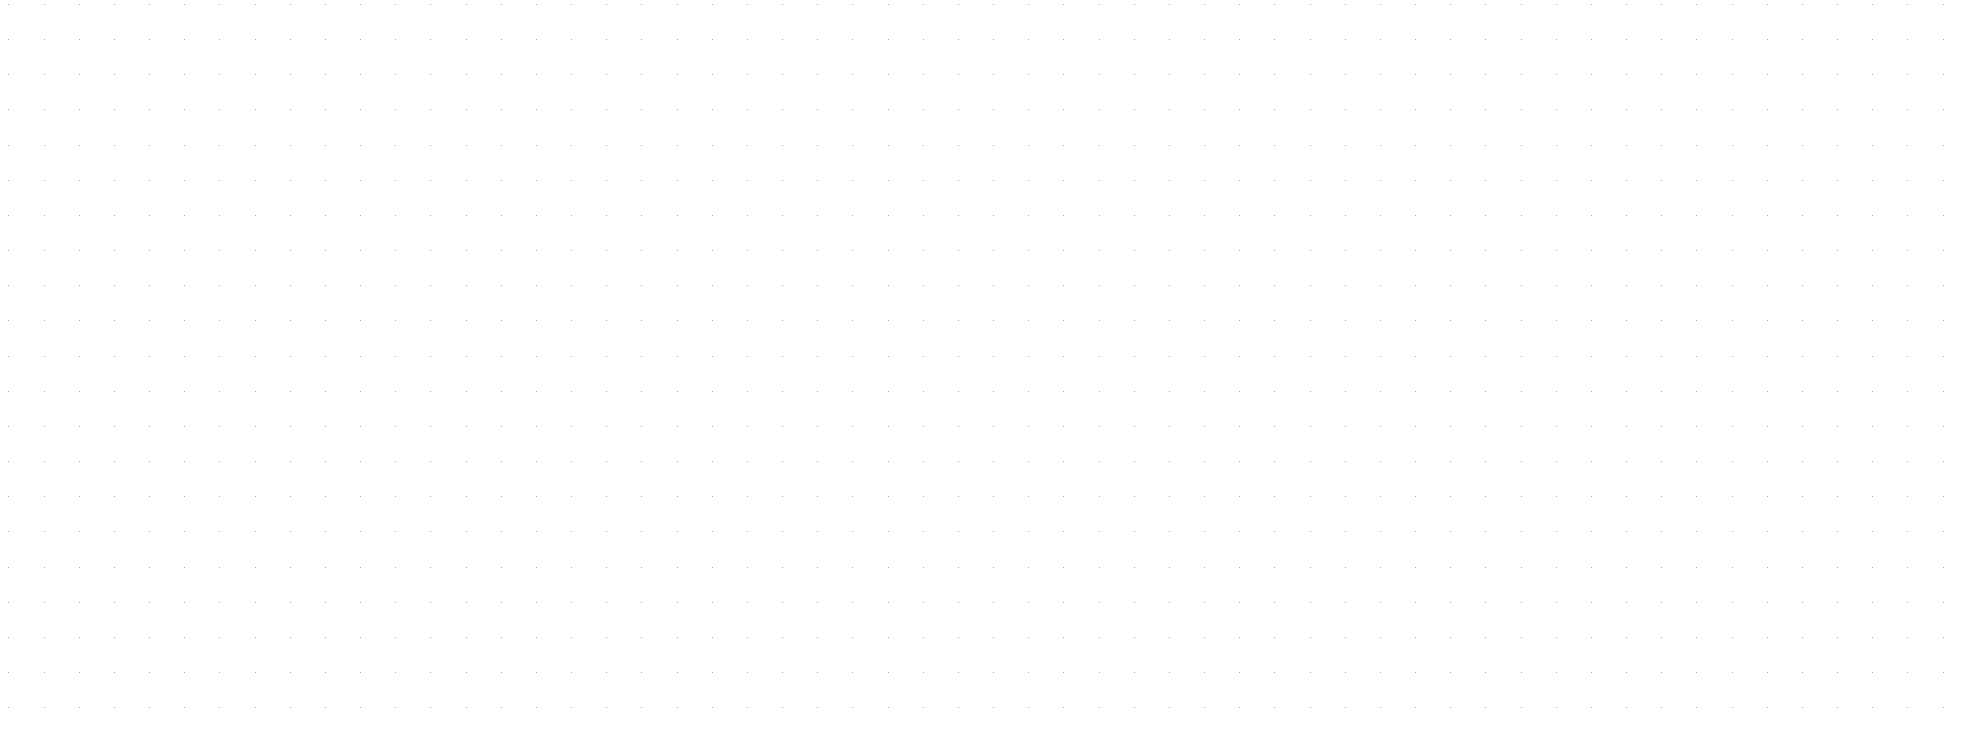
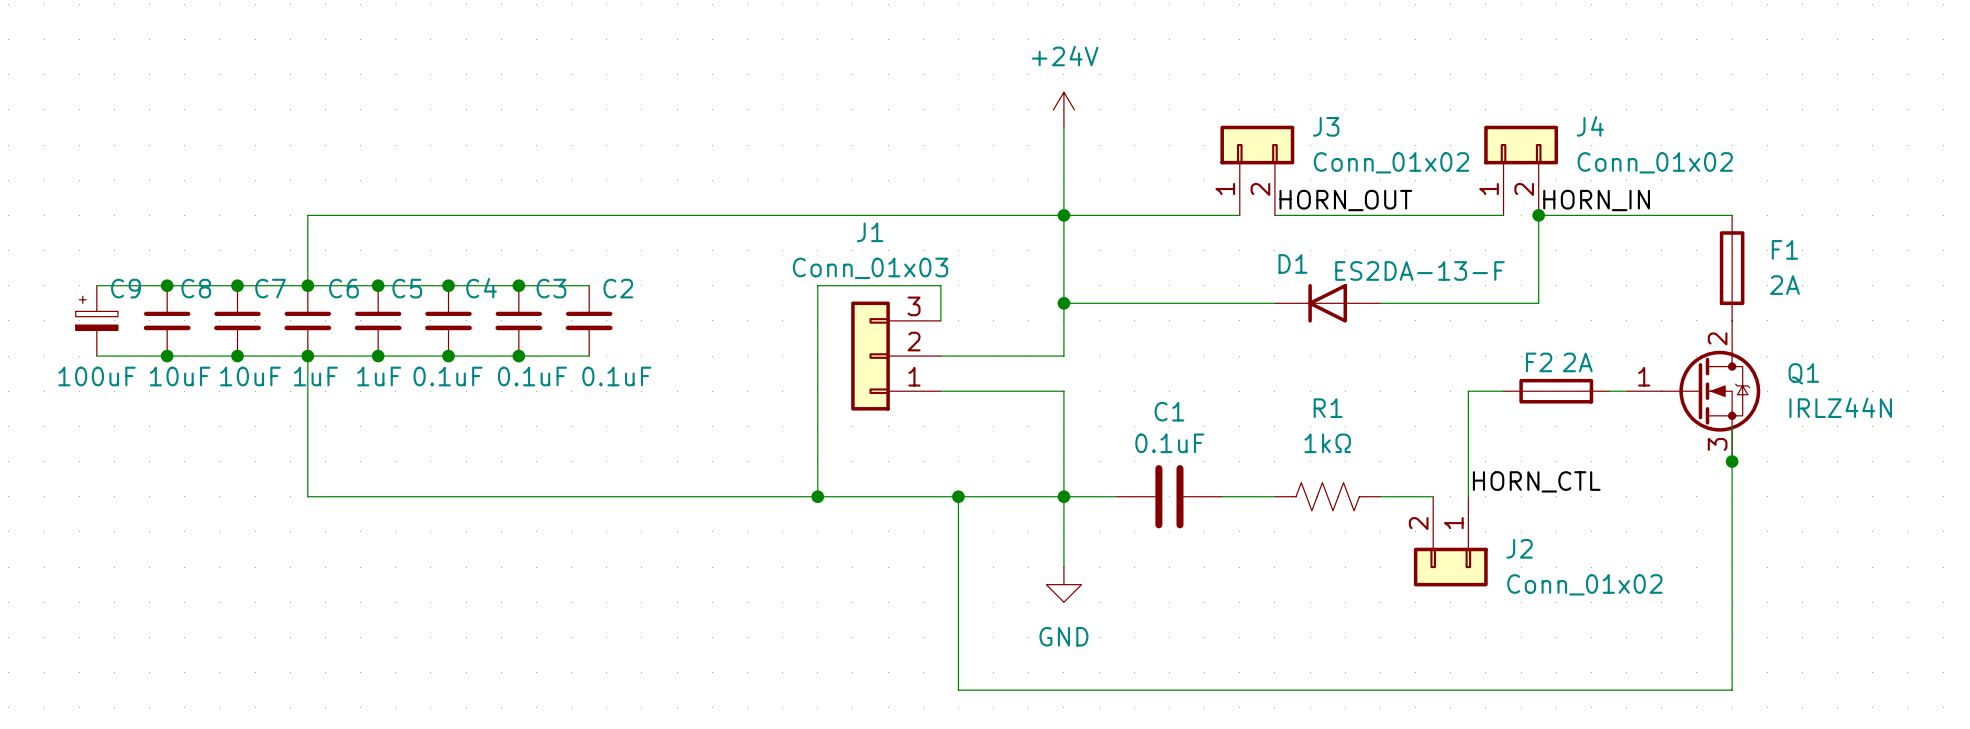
power symbol: none -> +24V (1063, 109)
wire: none -> (1063, 127) (1063, 356) (940, 356)
J3: none -> Conn_01x02 (1257, 170)
J4: none -> Conn_01x02 (1521, 170)
label: none -> HORN_OUT (1345, 200)
label: none -> HORN_IN (1596, 200)
junction: none -> (1063, 215)
wire: none -> (1239, 215) (307, 215) (307, 285)
wire: none -> (1274, 215) (1503, 215)
junction: none -> (1538, 215)
wire: none -> (1732, 215) (1538, 215) (1538, 303) (1380, 303)
F1: none -> 2A (1732, 268)
wire: none -> (96, 285) (589, 285)
junction: none -> (167, 285)
junction: none -> (237, 285)
junction: none -> (307, 285)
junction: none -> (378, 285)
junction: none -> (448, 285)
junction: none -> (518, 285)
wire: none -> (1063, 303) (1274, 303)
junction: none -> (1063, 303)
D1: none -> ES2DA-13-F (1327, 303)
C9: none -> 100uF (96, 320)
C8: none -> 10uF (167, 320)
C7: none -> 10uF (237, 320)
C6: none -> 1uF (307, 320)
C5: none -> 1uF (378, 320)
C4: none -> 0.1uF (448, 320)
C3: none -> 0.1uF (518, 320)
C2: none -> 0.1uF (589, 320)
wire: none -> (940, 320) (940, 285) (817, 285) (817, 496)
wire: none -> (96, 356) (589, 356)
junction: none -> (167, 356)
junction: none -> (237, 356)
wire: none -> (307, 356) (307, 496) (1116, 496)
junction: none -> (307, 356)
junction: none -> (378, 356)
junction: none -> (448, 356)
junction: none -> (518, 356)
J1: none -> Conn_01x03 (896, 356)
wire: none -> (940, 391) (1063, 391) (1063, 567)
wire: none -> (1503, 391) (1468, 391) (1468, 496)
F2: none -> 2A (1556, 391)
wire: none -> (1609, 391) (1626, 391)
Q1: none -> IRLZ44N (1693, 391)
wire: none -> (1732, 426) (1732, 690) (958, 690) (958, 496)
junction: none -> (1732, 461)
label: none -> HORN_CTL (1536, 481)
junction: none -> (817, 496)
junction: none -> (958, 496)
junction: none -> (1063, 496)
C1: none -> 0.1uF (1169, 496)
wire: none -> (1222, 496) (1274, 496)
R1: none -> 1kΩ (1327, 496)
wire: none -> (1380, 496) (1433, 496)
J2: none -> Conn_01x02 (1450, 541)
power symbol: none -> GND (1063, 584)

